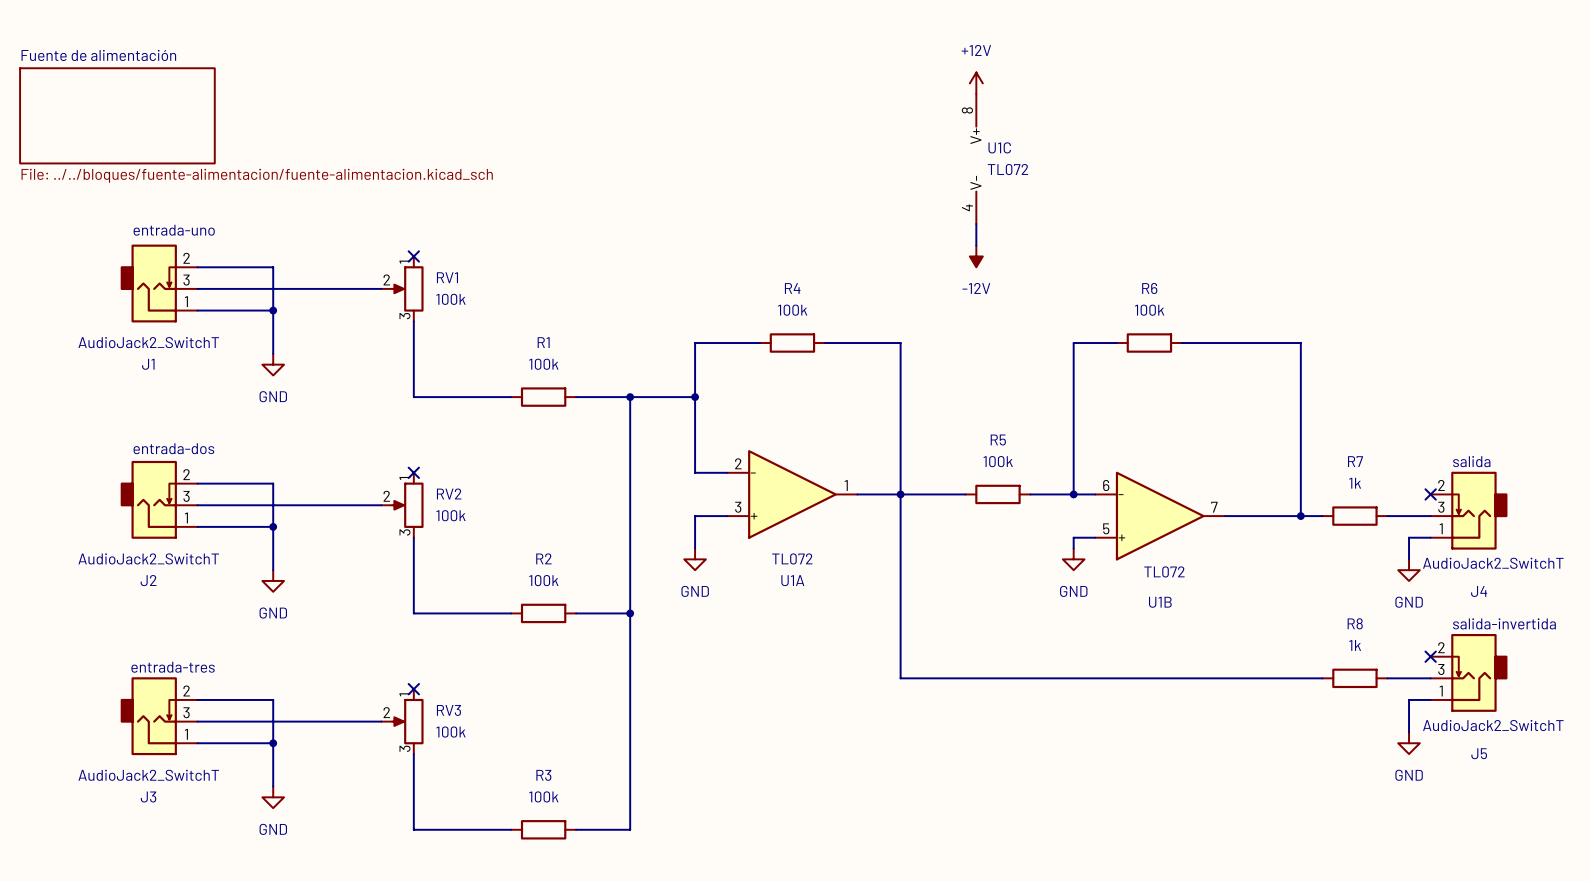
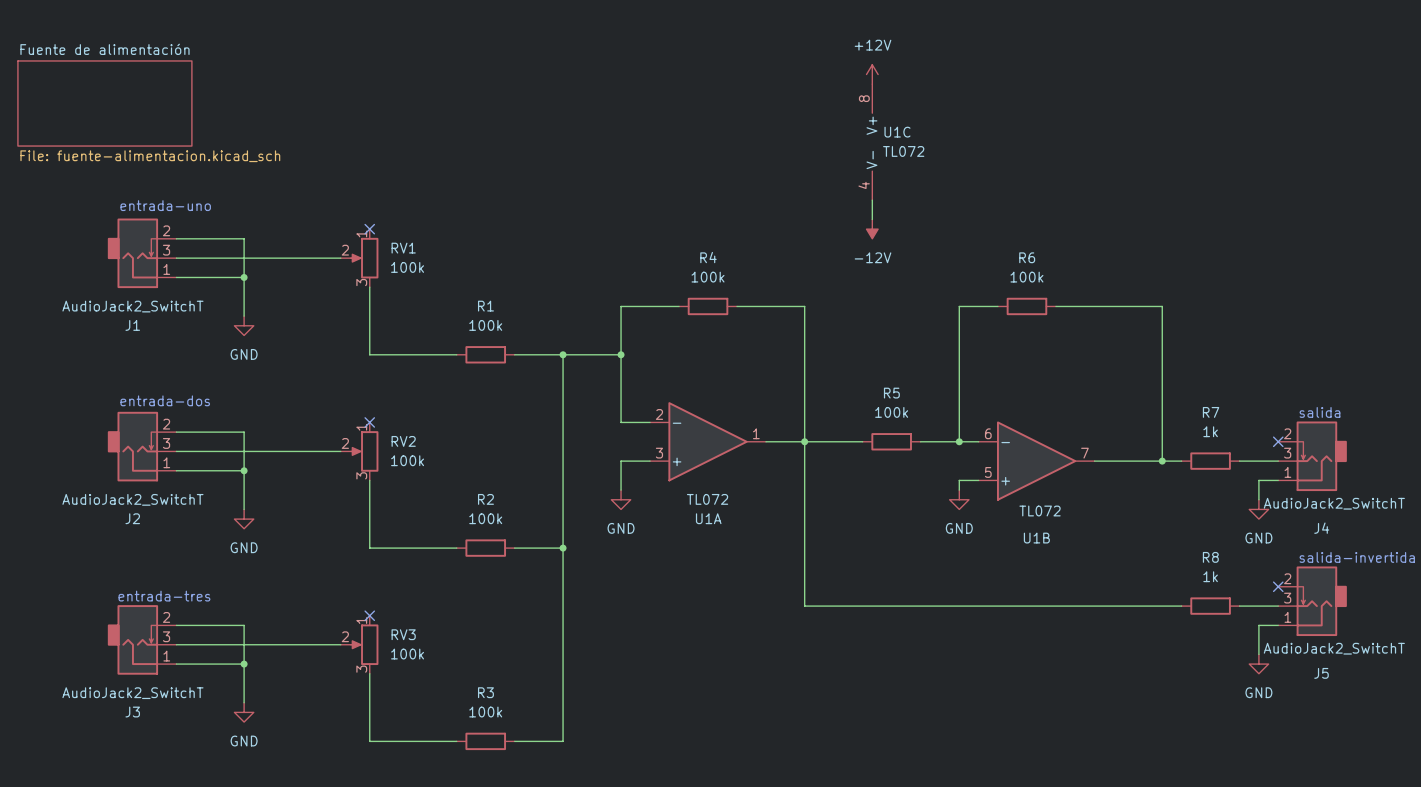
sheet Fuente de alimentación value: File: ../../bloques/fuente-alimentacion/fuente-alimentacion.kicad_sch (257, 175) -> File: fuente-alimentacion.kicad_sch (150, 156)

